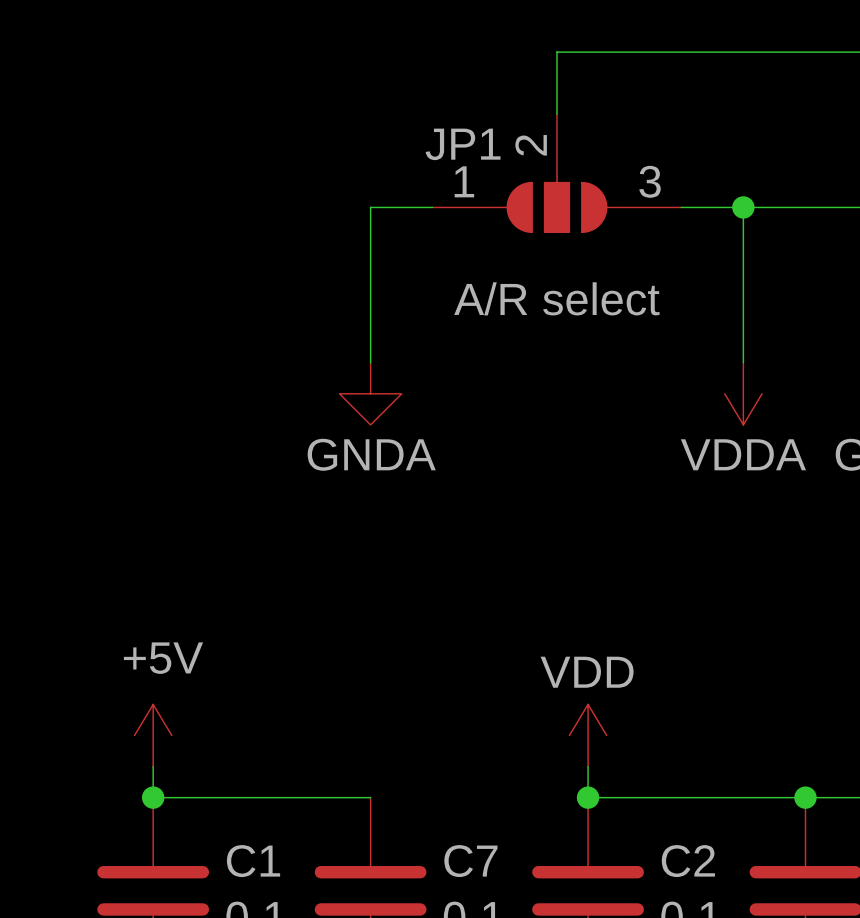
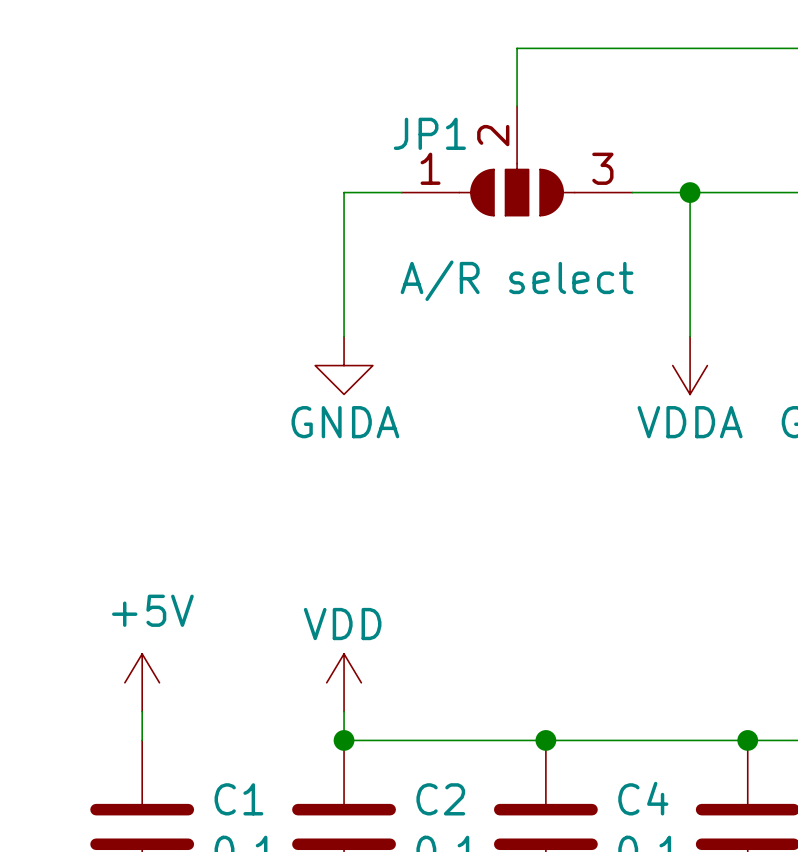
power symbol position: VDD (588, 735) -> VDD (344, 682)
wire: (588, 766) (588, 797) -> (344, 711) (344, 740) (545, 740)
wire: (153, 797) (370, 797) -> none
junction: (153, 797) -> none
junction: none -> (344, 740)
C7 name: C7 (470, 861) -> C2 (440, 799)
C2 name: C2 (688, 861) -> C4 (643, 798)

